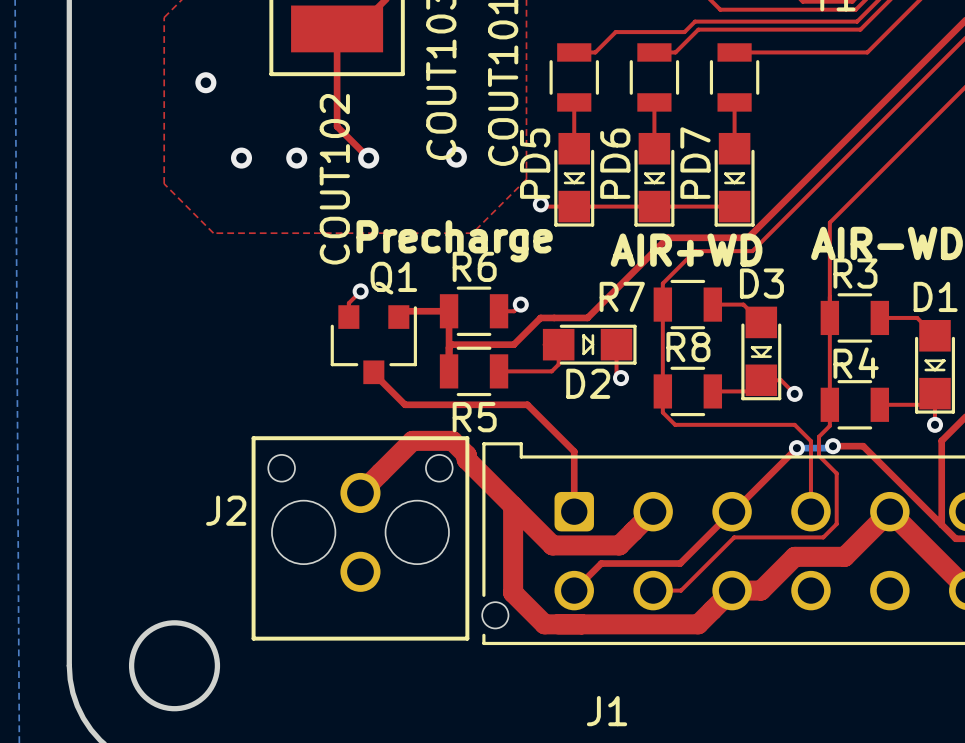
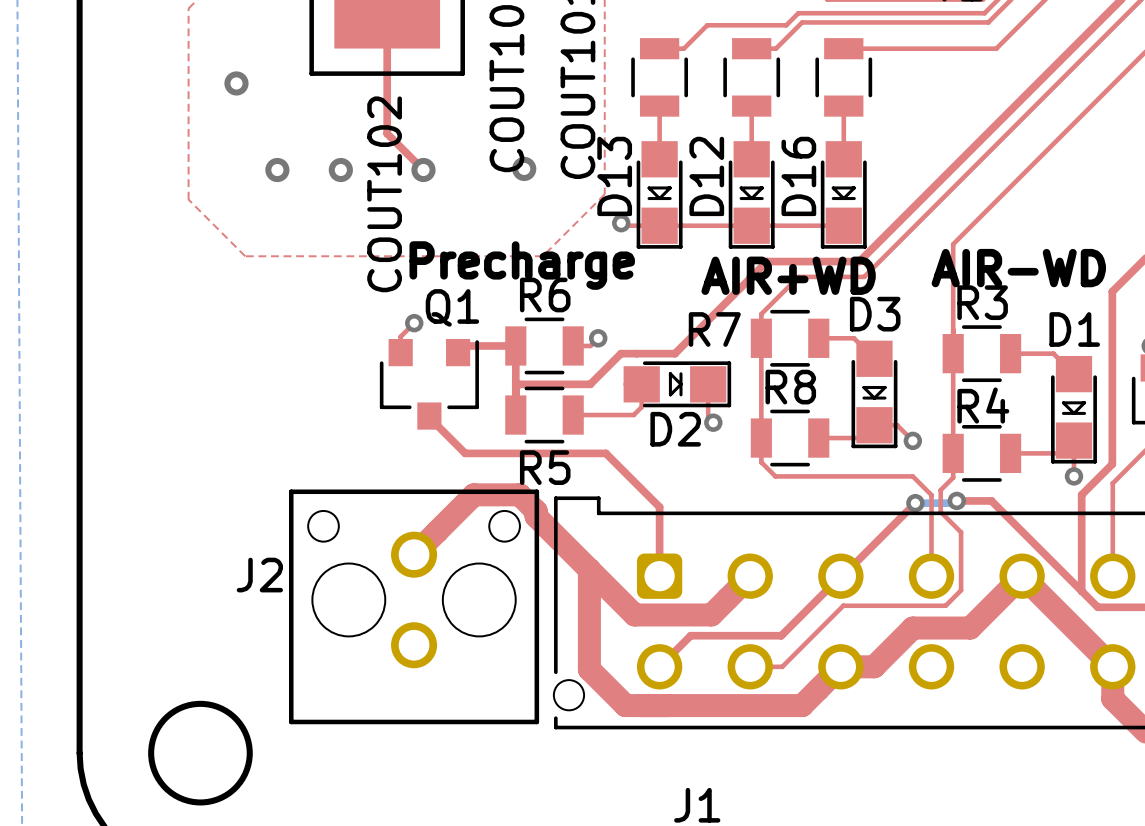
PD5 name: PD5 (535, 163) -> D13 (614, 176)
PD6 name: PD6 (615, 163) -> D12 (706, 176)
PD7 name: PD7 (695, 163) -> D16 (798, 176)

